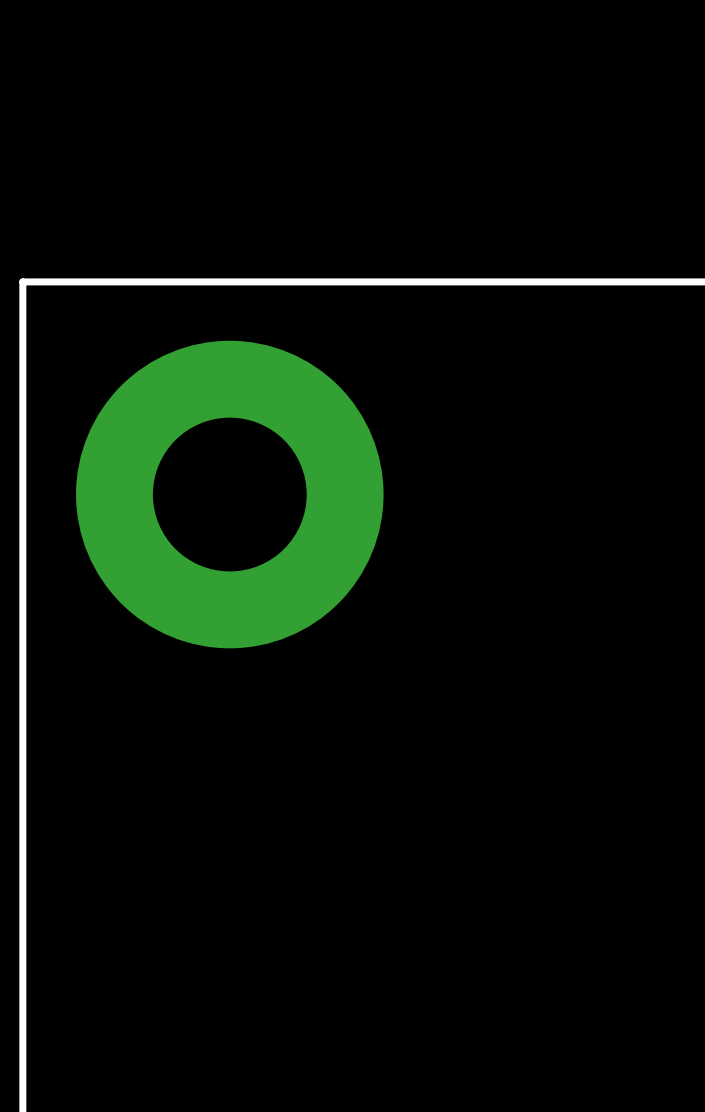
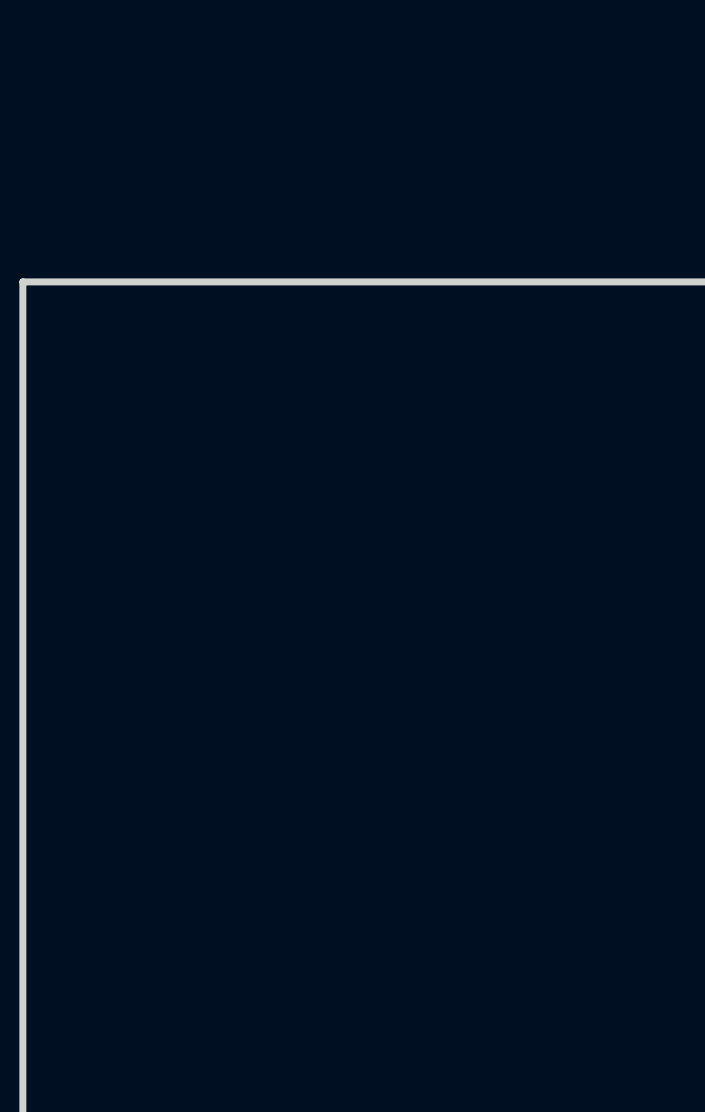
part: (229, 494) -> none

